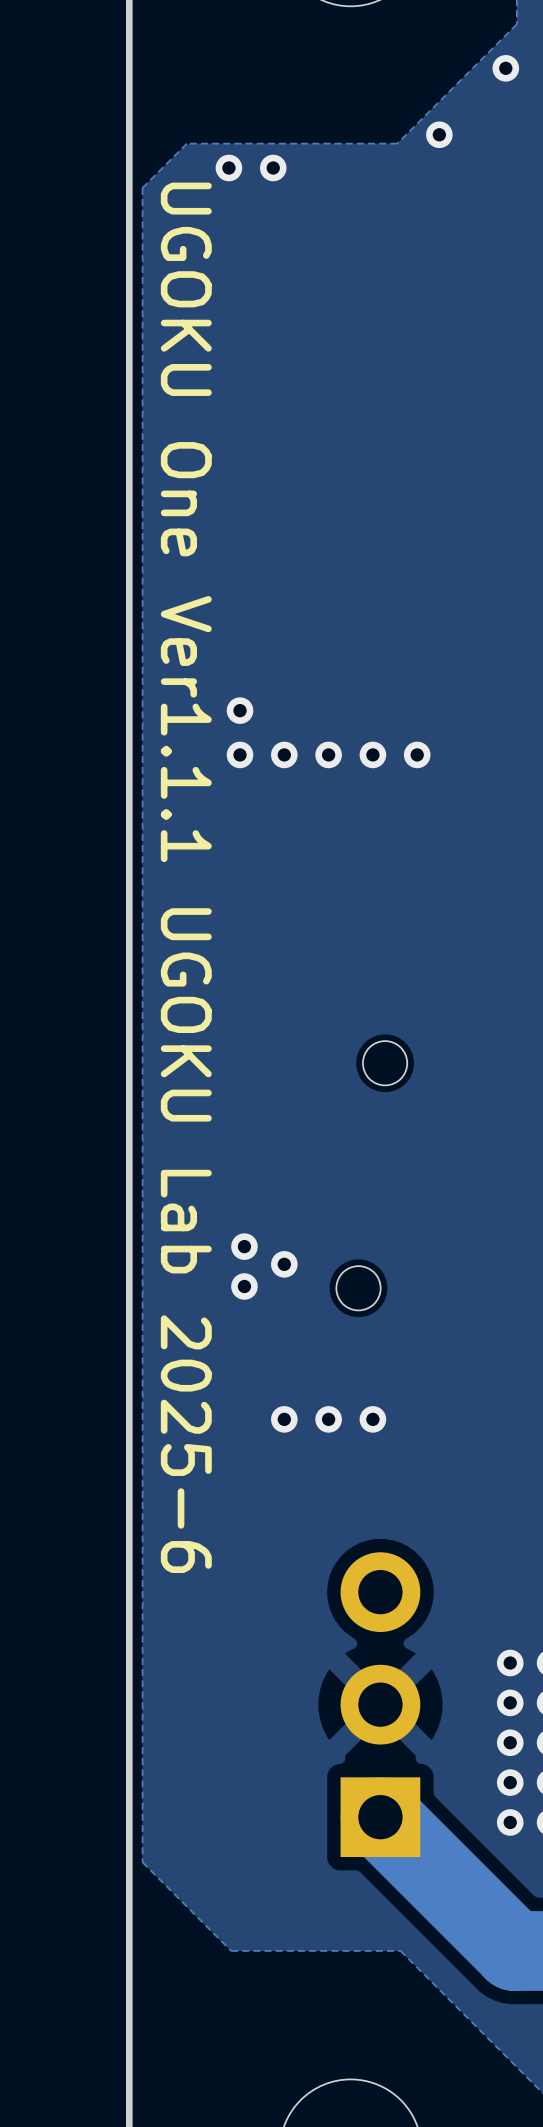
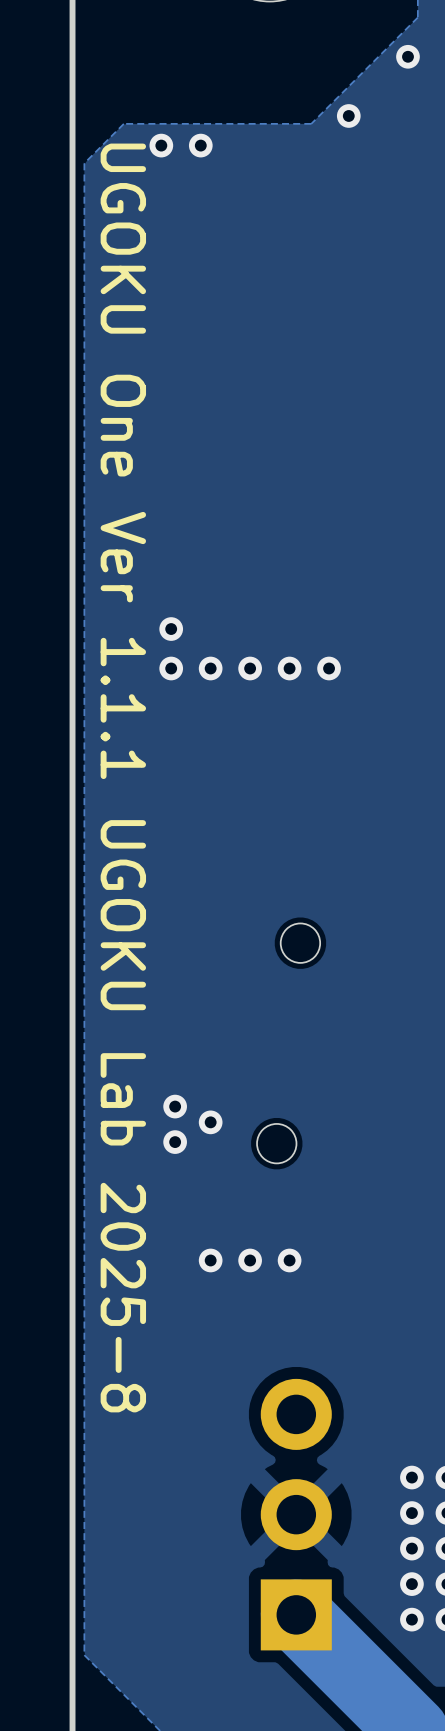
text: UGOKU One Ver1.1.1 UGOKU Lab 2025-6 (186, 877) -> UGOKU One Ver 1.1.1 UGOKU Lab 2025-8 (123, 777)

